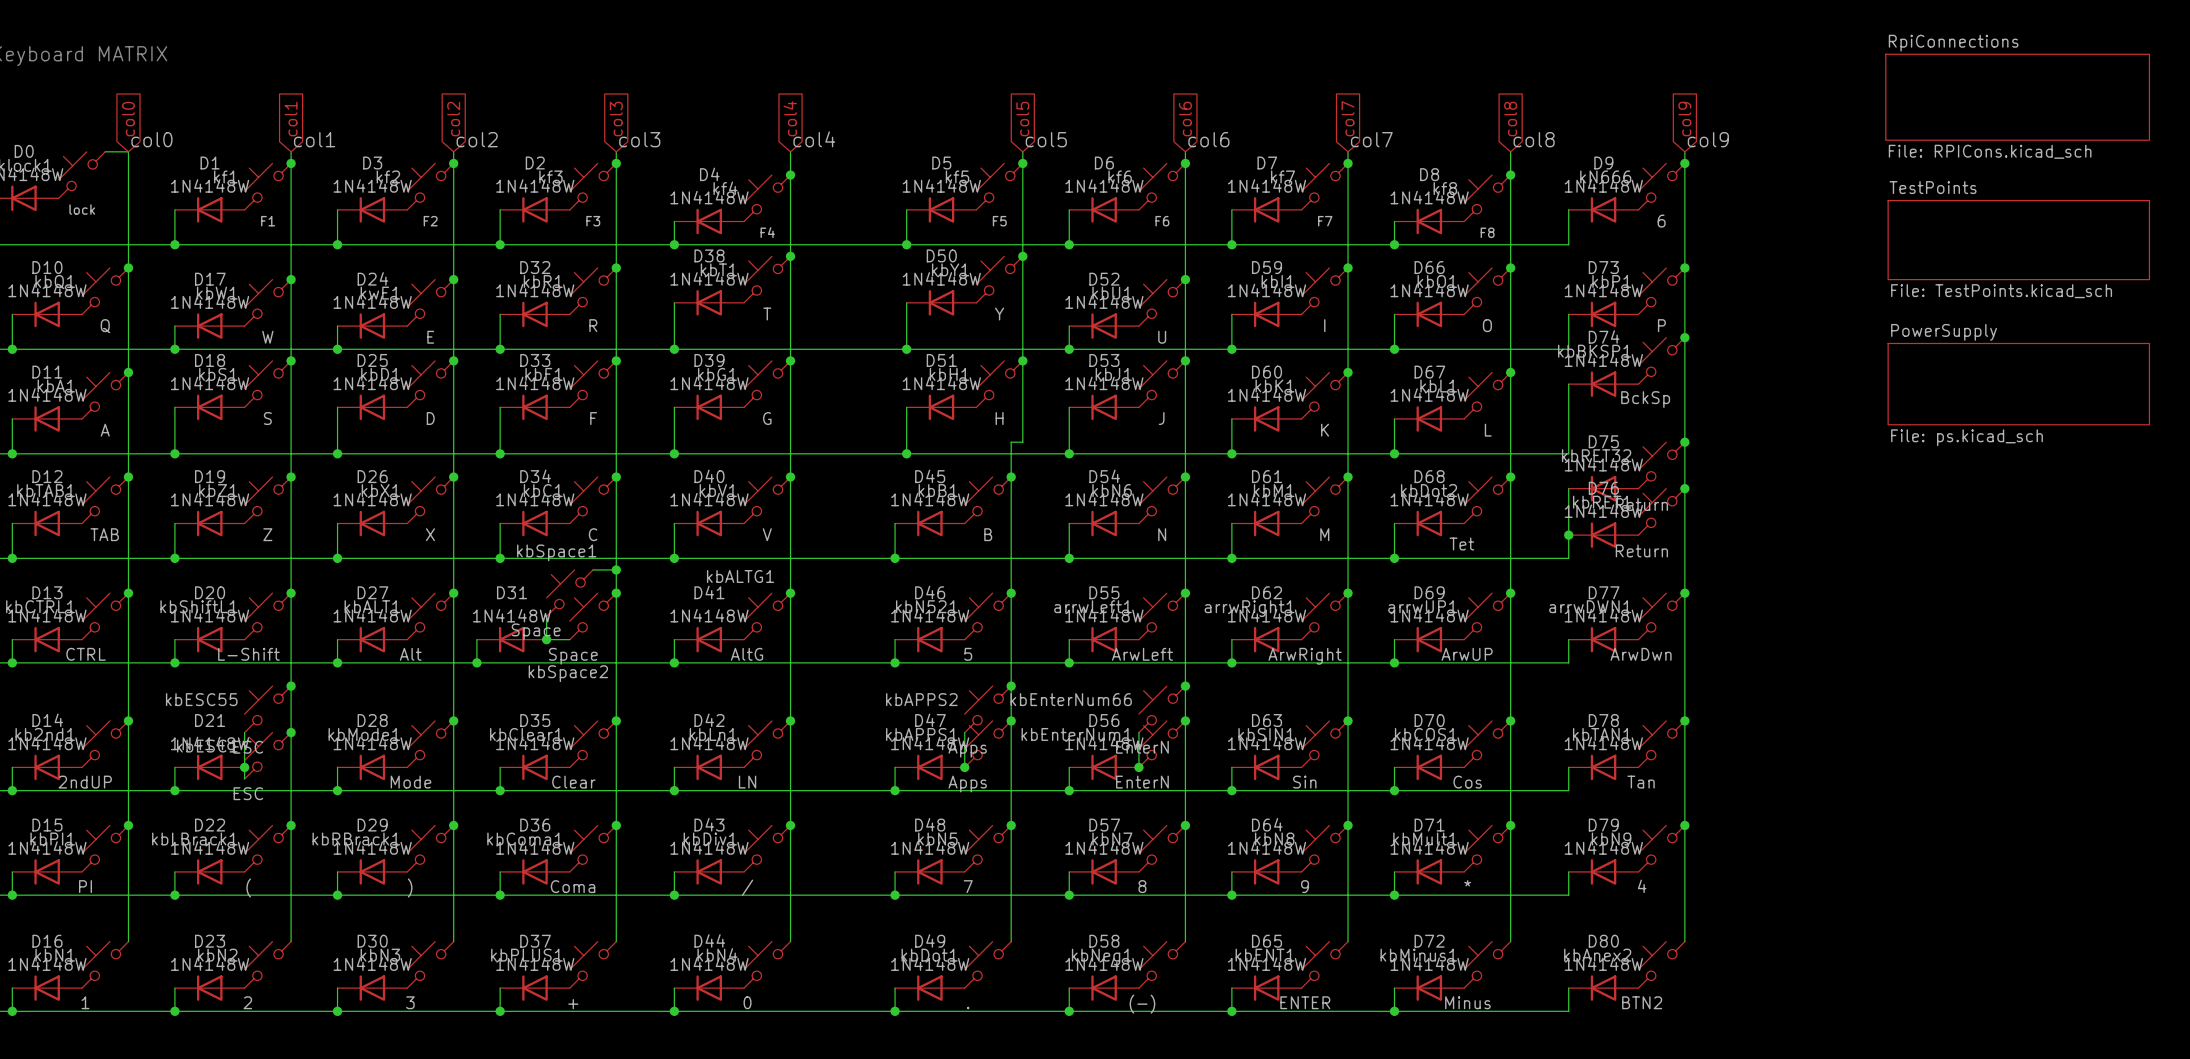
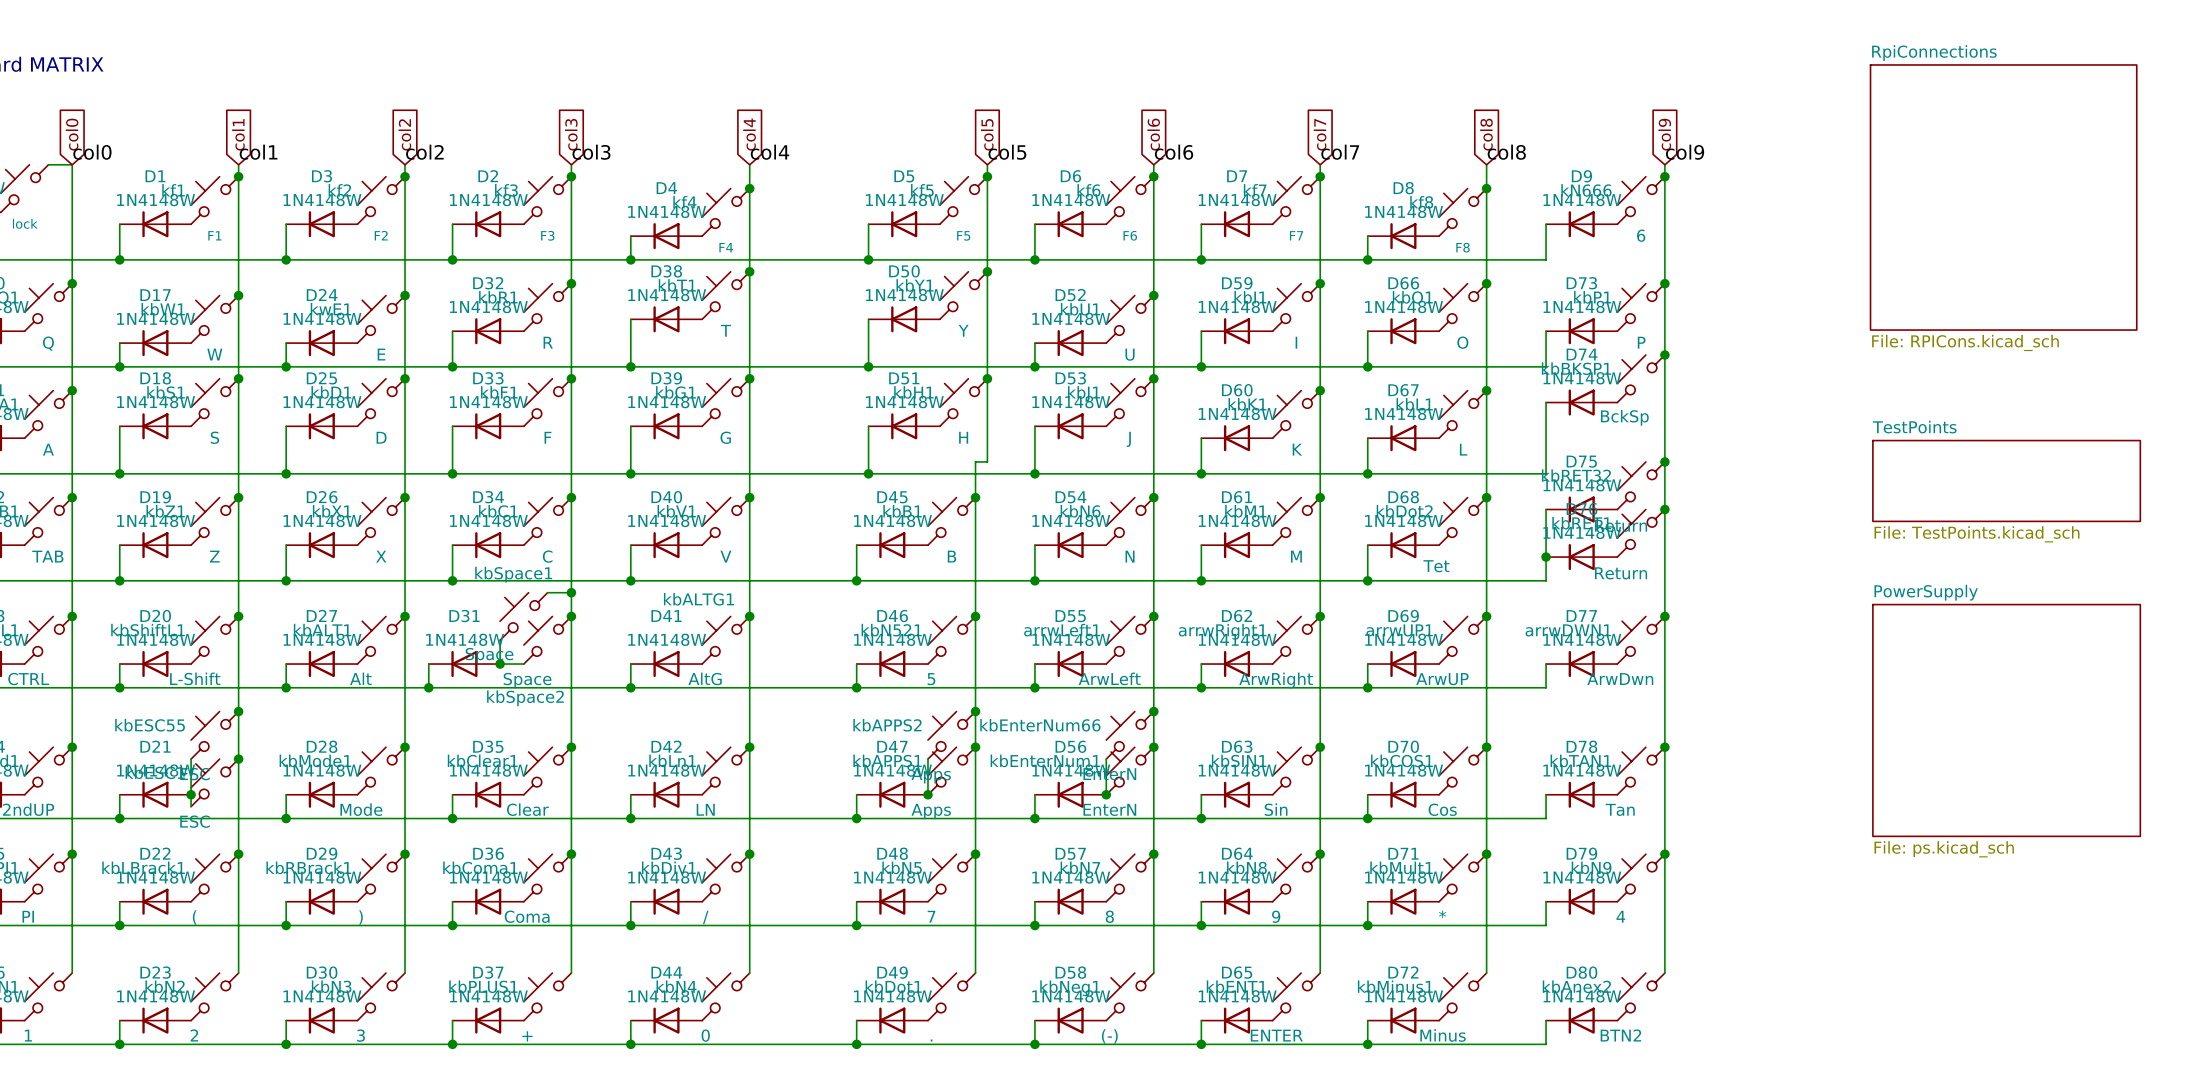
sheet RpiConnections: File: RPICons.kicad_sch (2017, 97) -> none
sheet RpiConnections: none -> File: RPICons.kicad_sch (2003, 197)
sheet TestPoints position: (2018, 240) -> (2006, 480)
sheet PowerSupply: File: ps.kicad_sch (2018, 384) -> none
sheet PowerSupply: none -> File: ps.kicad_sch (2006, 720)

